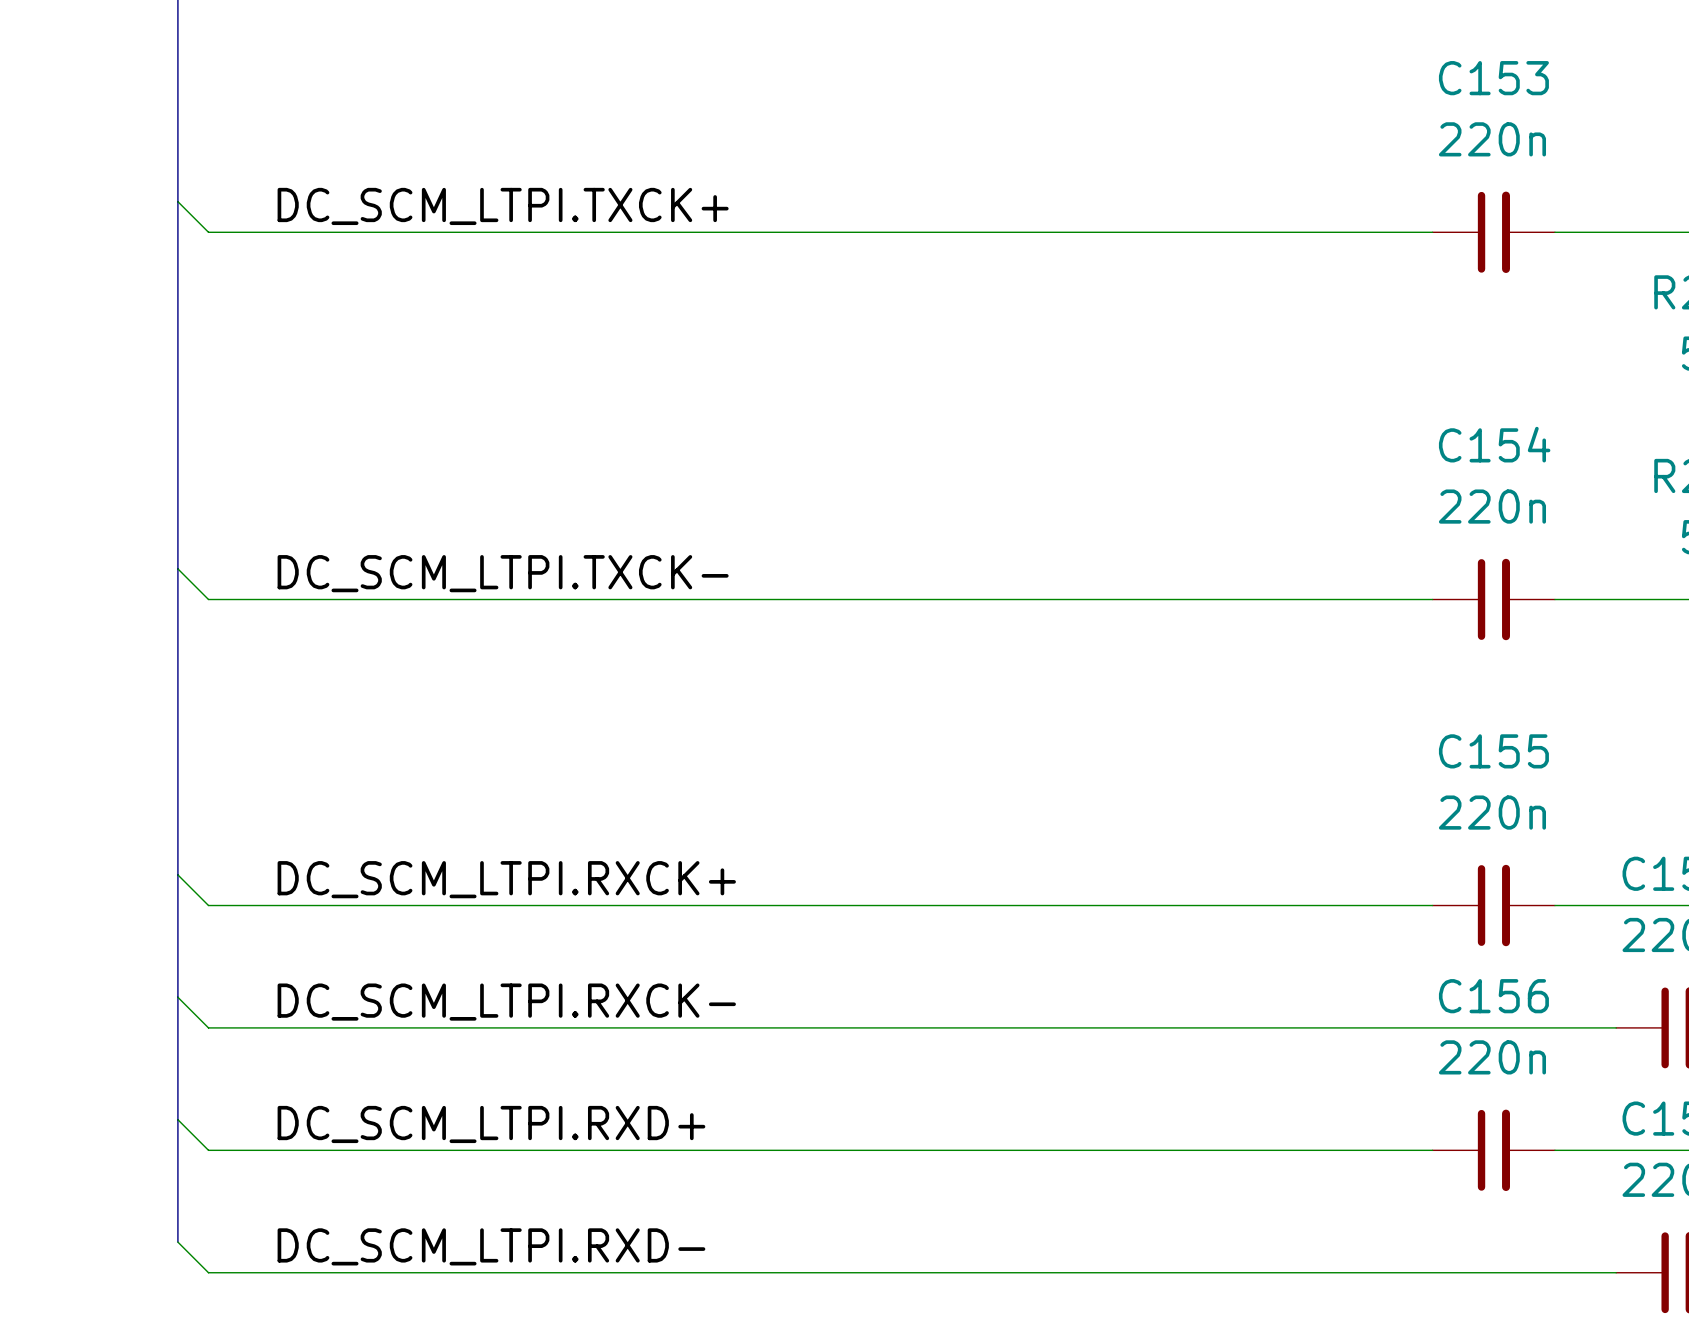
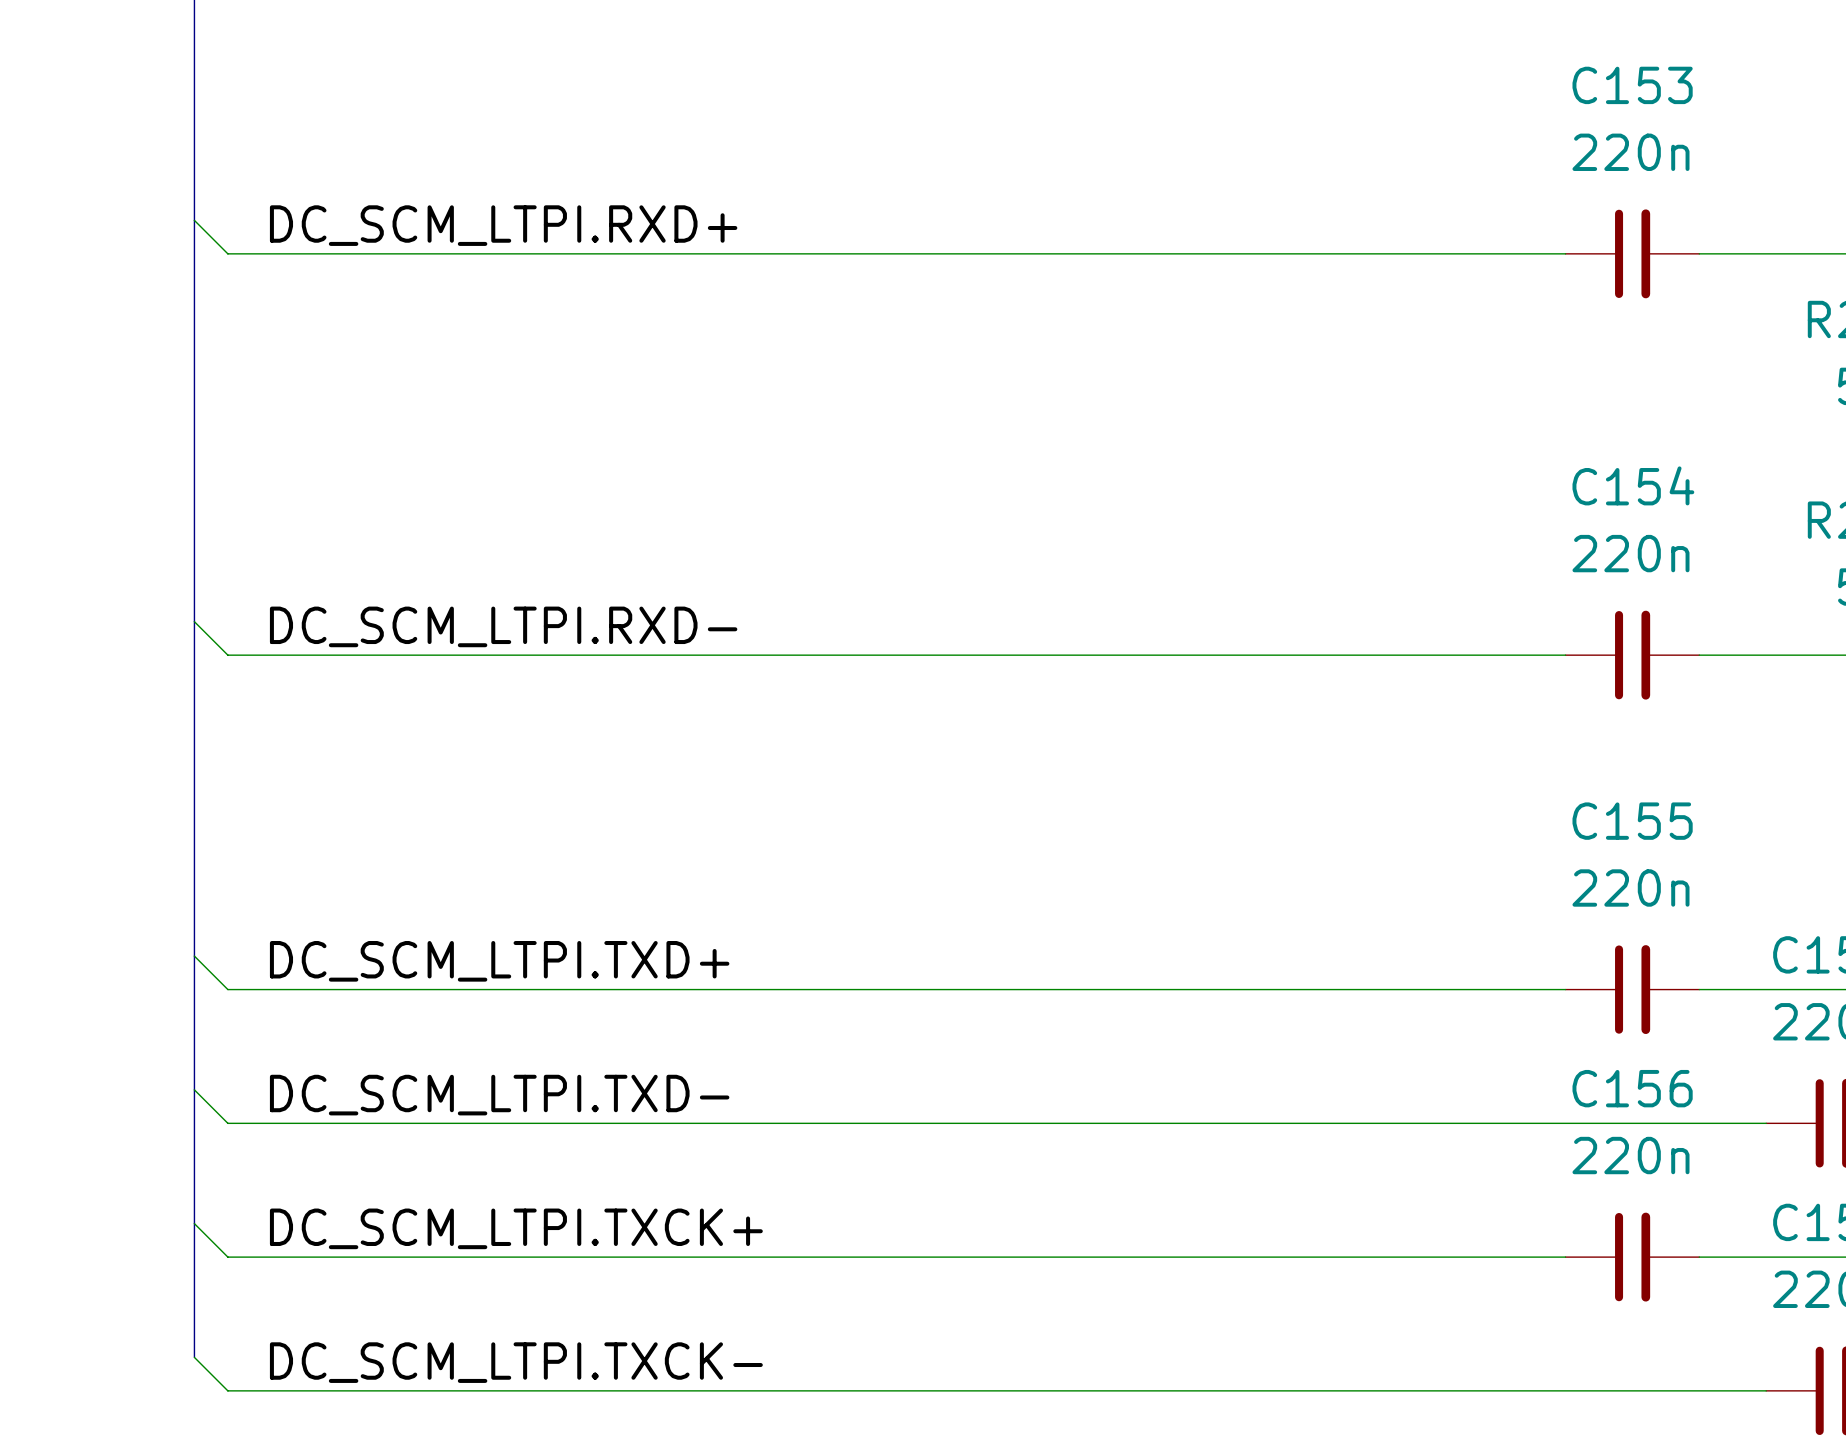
label: DC_SCM_LTPI.TXCK+ (503, 206) -> DC_SCM_LTPI.RXD+ (503, 225)
label: DC_SCM_LTPI.TXCK- (503, 573) -> DC_SCM_LTPI.RXD- (503, 626)
label: DC_SCM_LTPI.RXCK+ (506, 879) -> DC_SCM_LTPI.TXD+ (499, 961)
label: DC_SCM_LTPI.RXCK- (506, 1002) -> DC_SCM_LTPI.TXD- (499, 1095)
label: DC_SCM_LTPI.RXD+ (491, 1124) -> DC_SCM_LTPI.TXCK+ (516, 1228)
label: DC_SCM_LTPI.RXD- (491, 1246) -> DC_SCM_LTPI.TXCK- (516, 1362)

